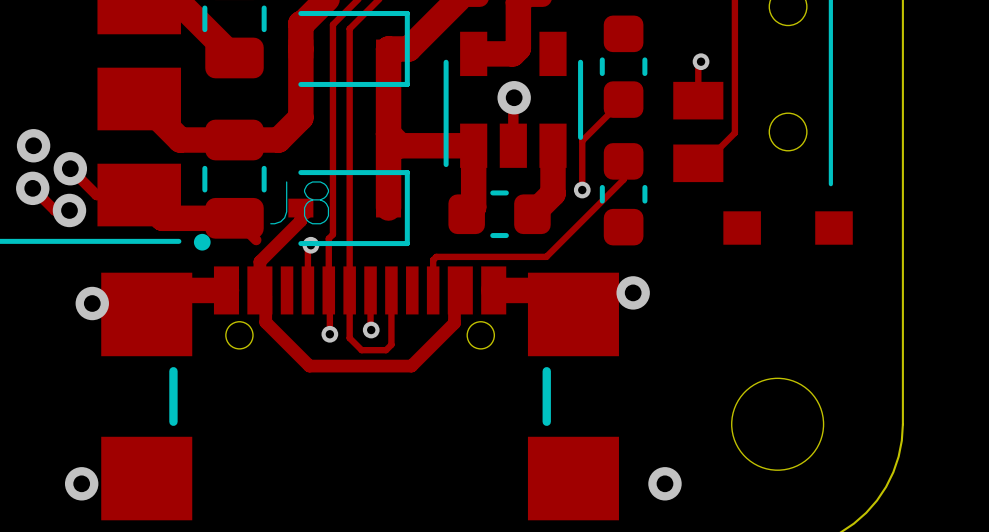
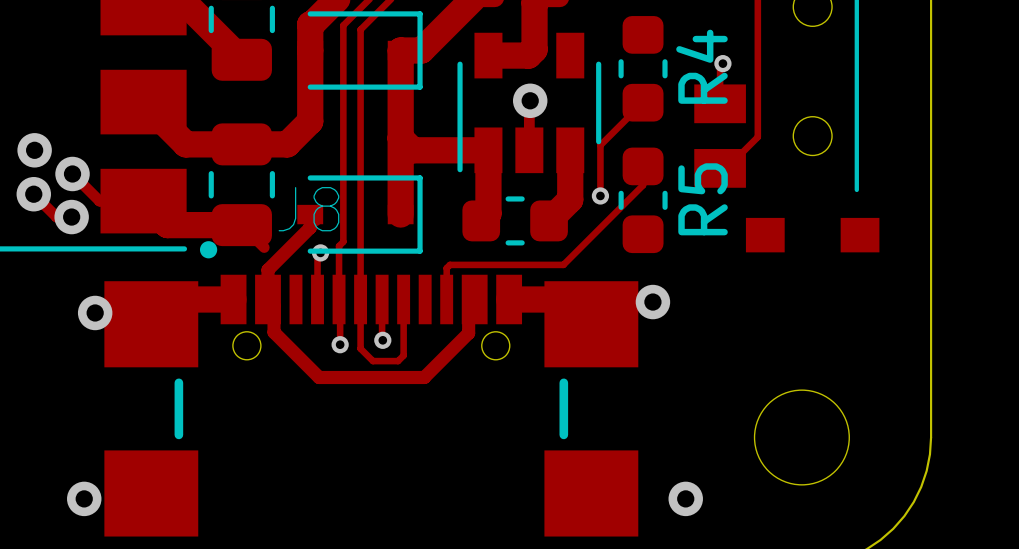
R4 name: none -> R4 (701, 66)
R5 name: none -> R5 (703, 199)

